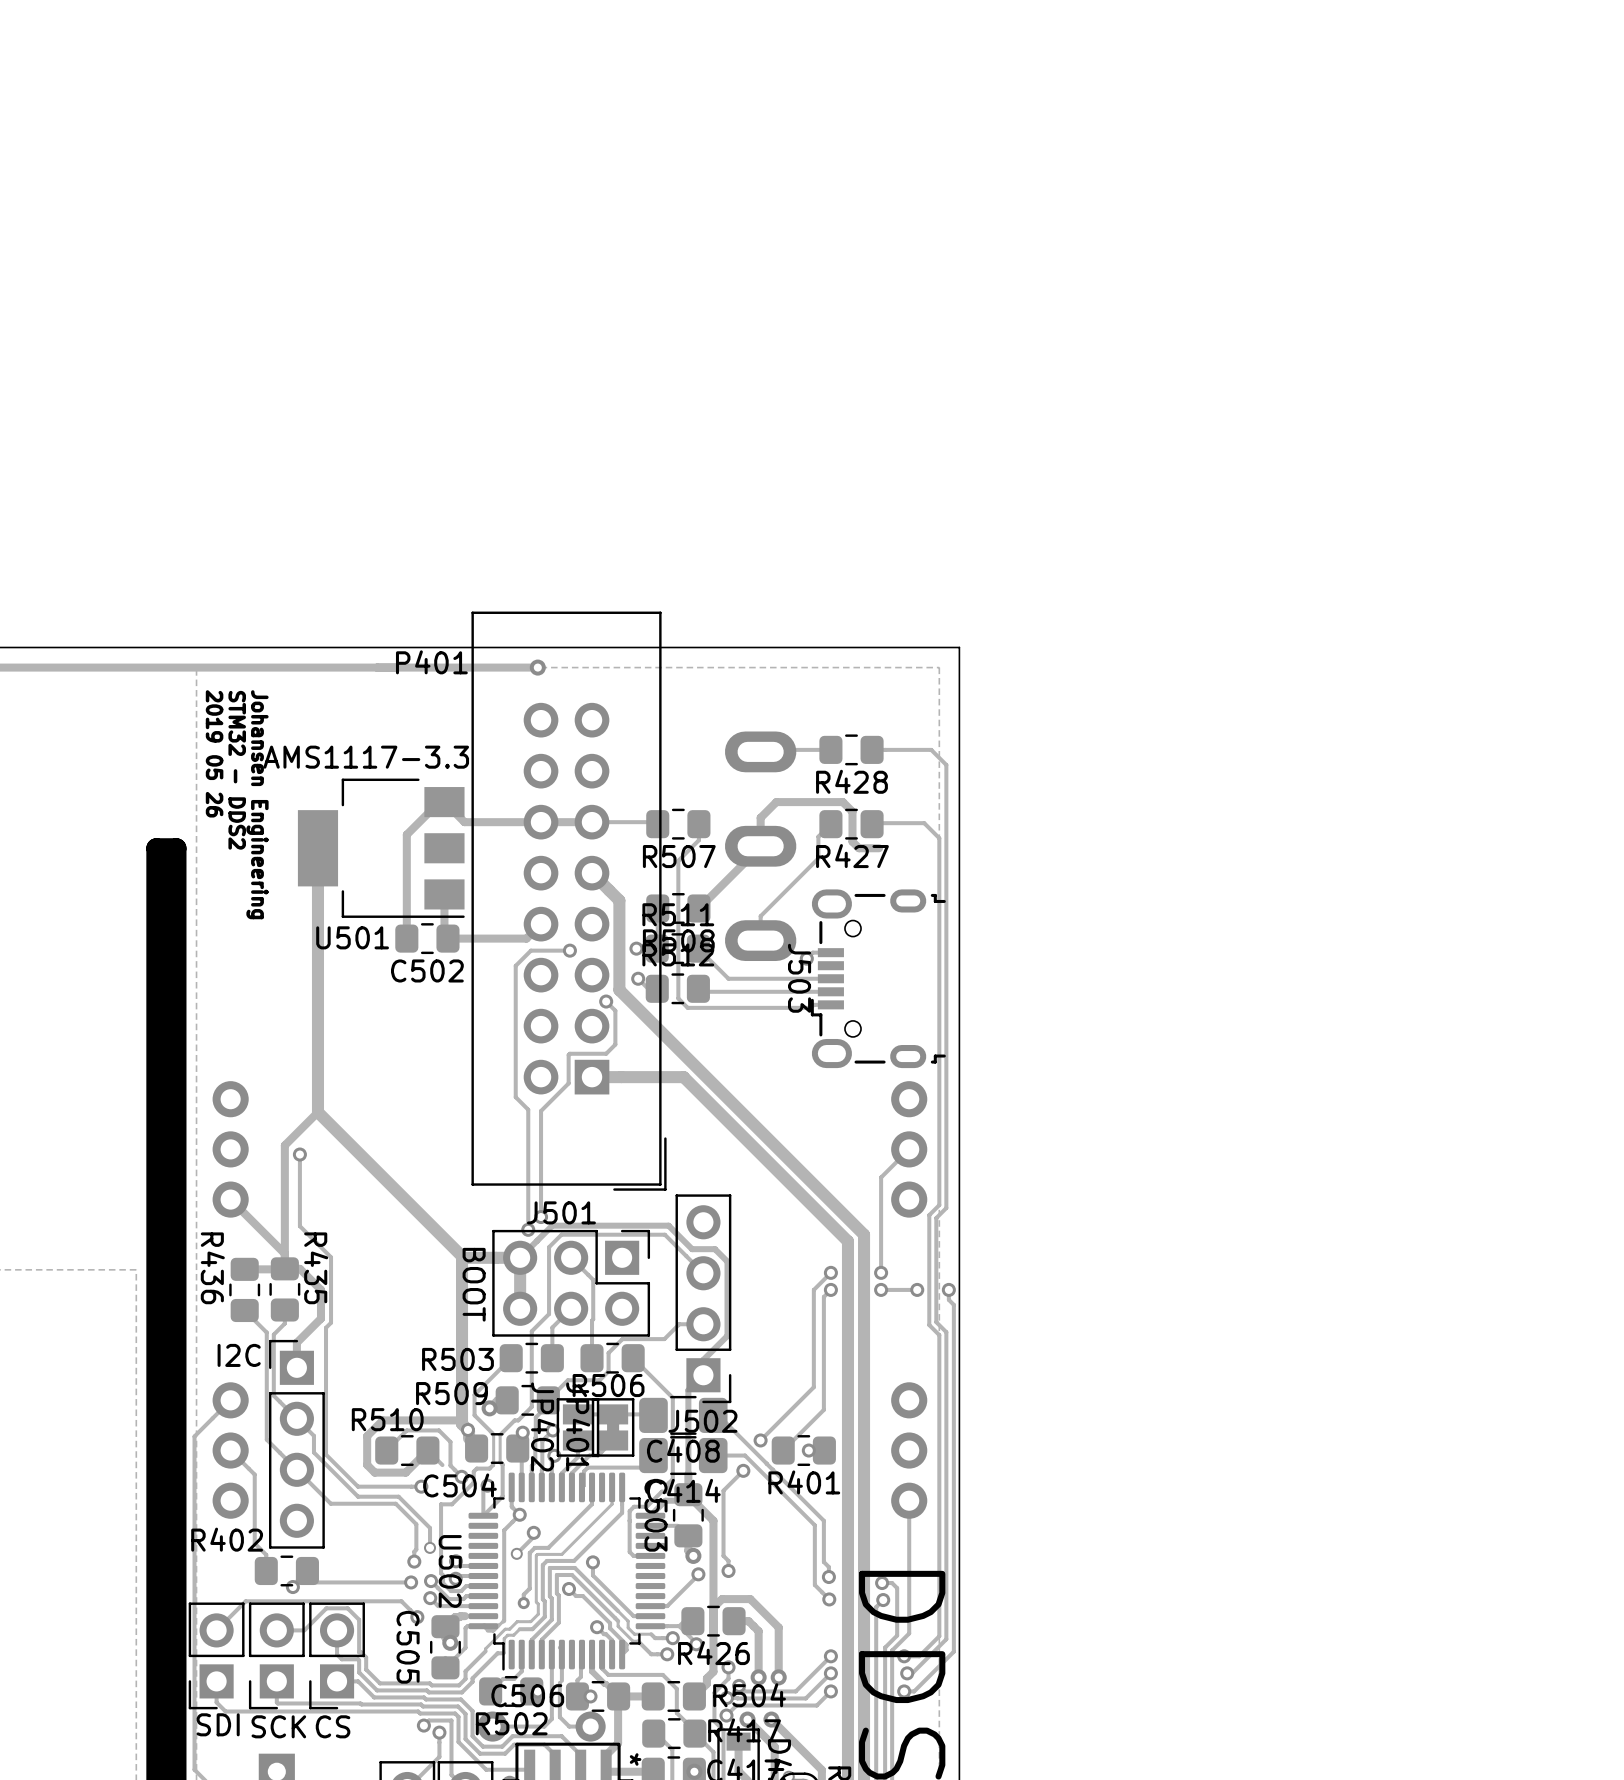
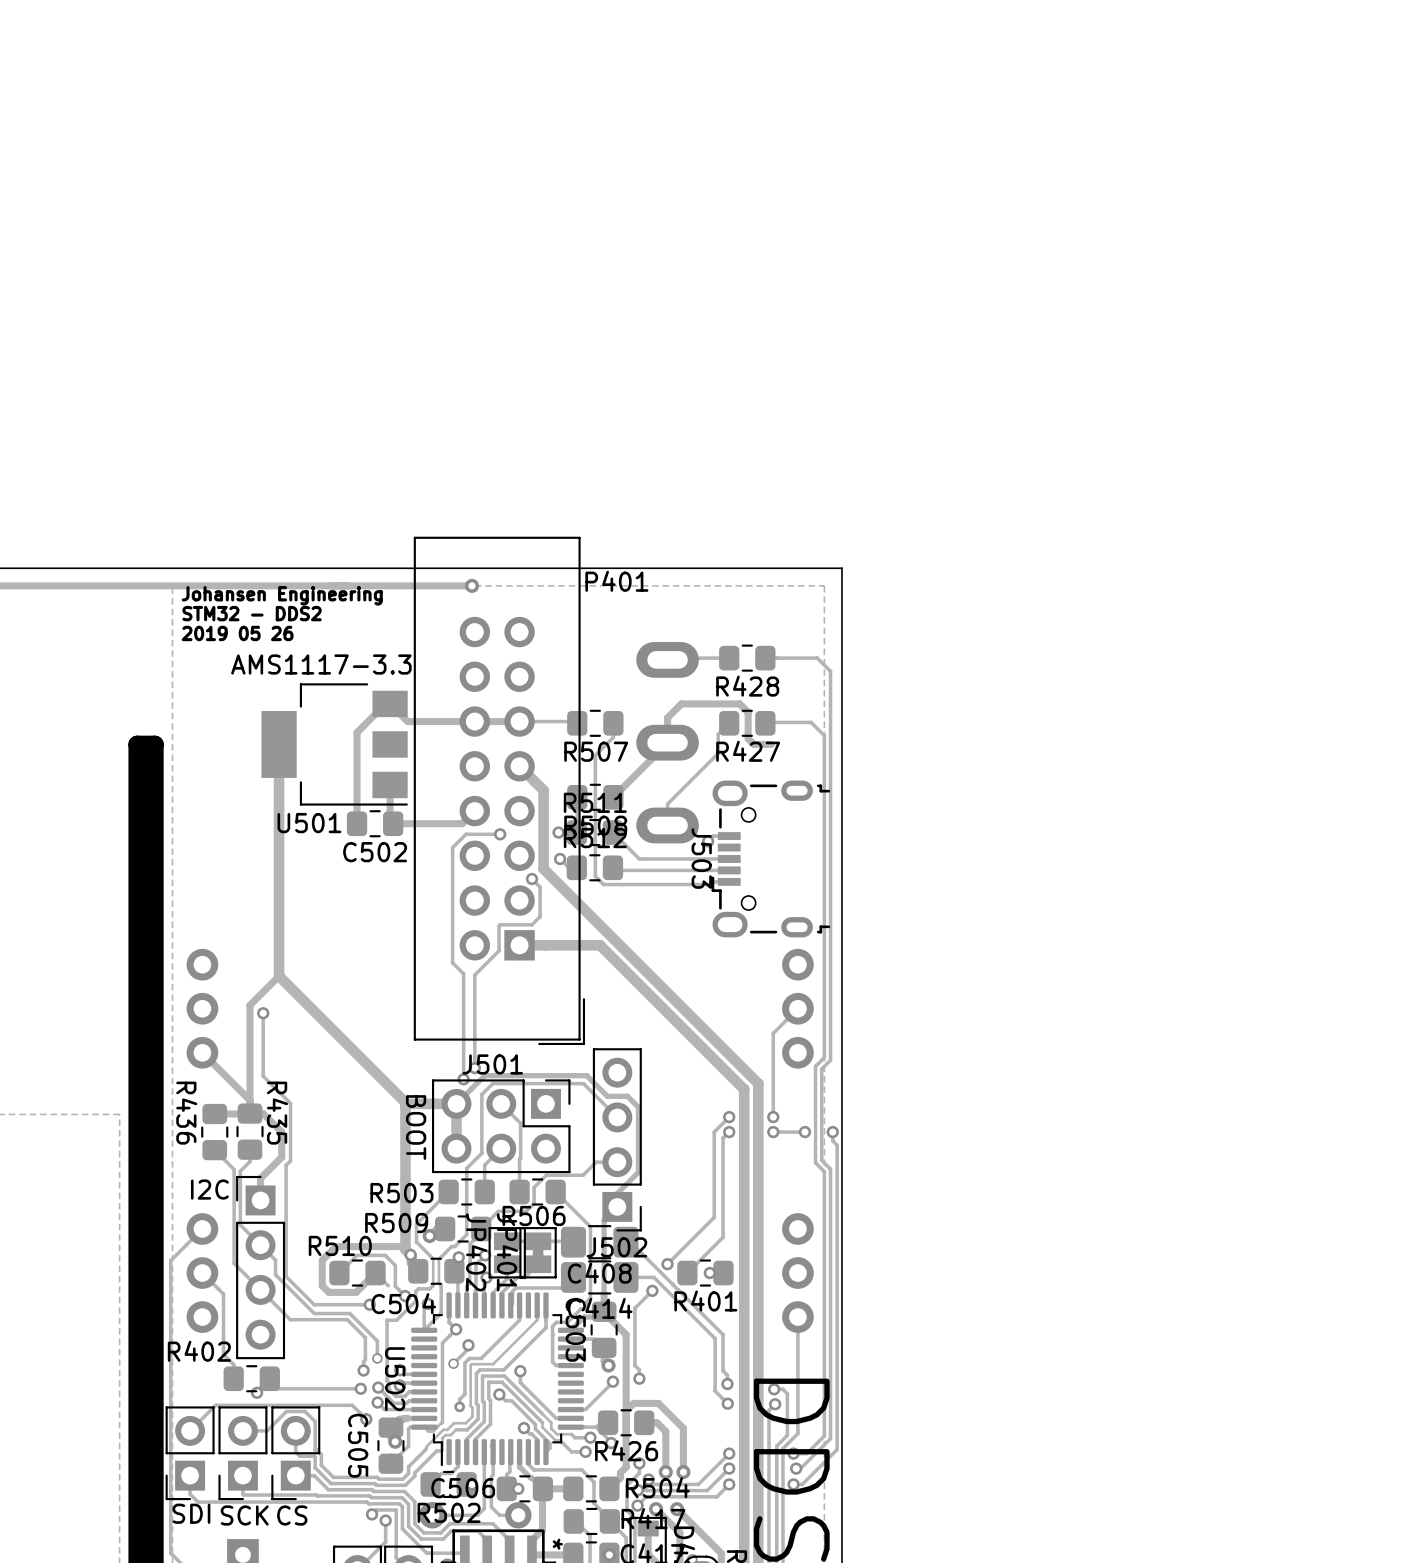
P401 name position: P401 (431, 662) -> P401 (616, 581)
text rotation: 0° (214, 753) -> 90° counterclockwise (237, 633)
text rotation: 0° (237, 770) -> 90° counterclockwise (252, 613)
text rotation: 0° (257, 804) -> 90° counterclockwise (282, 595)

